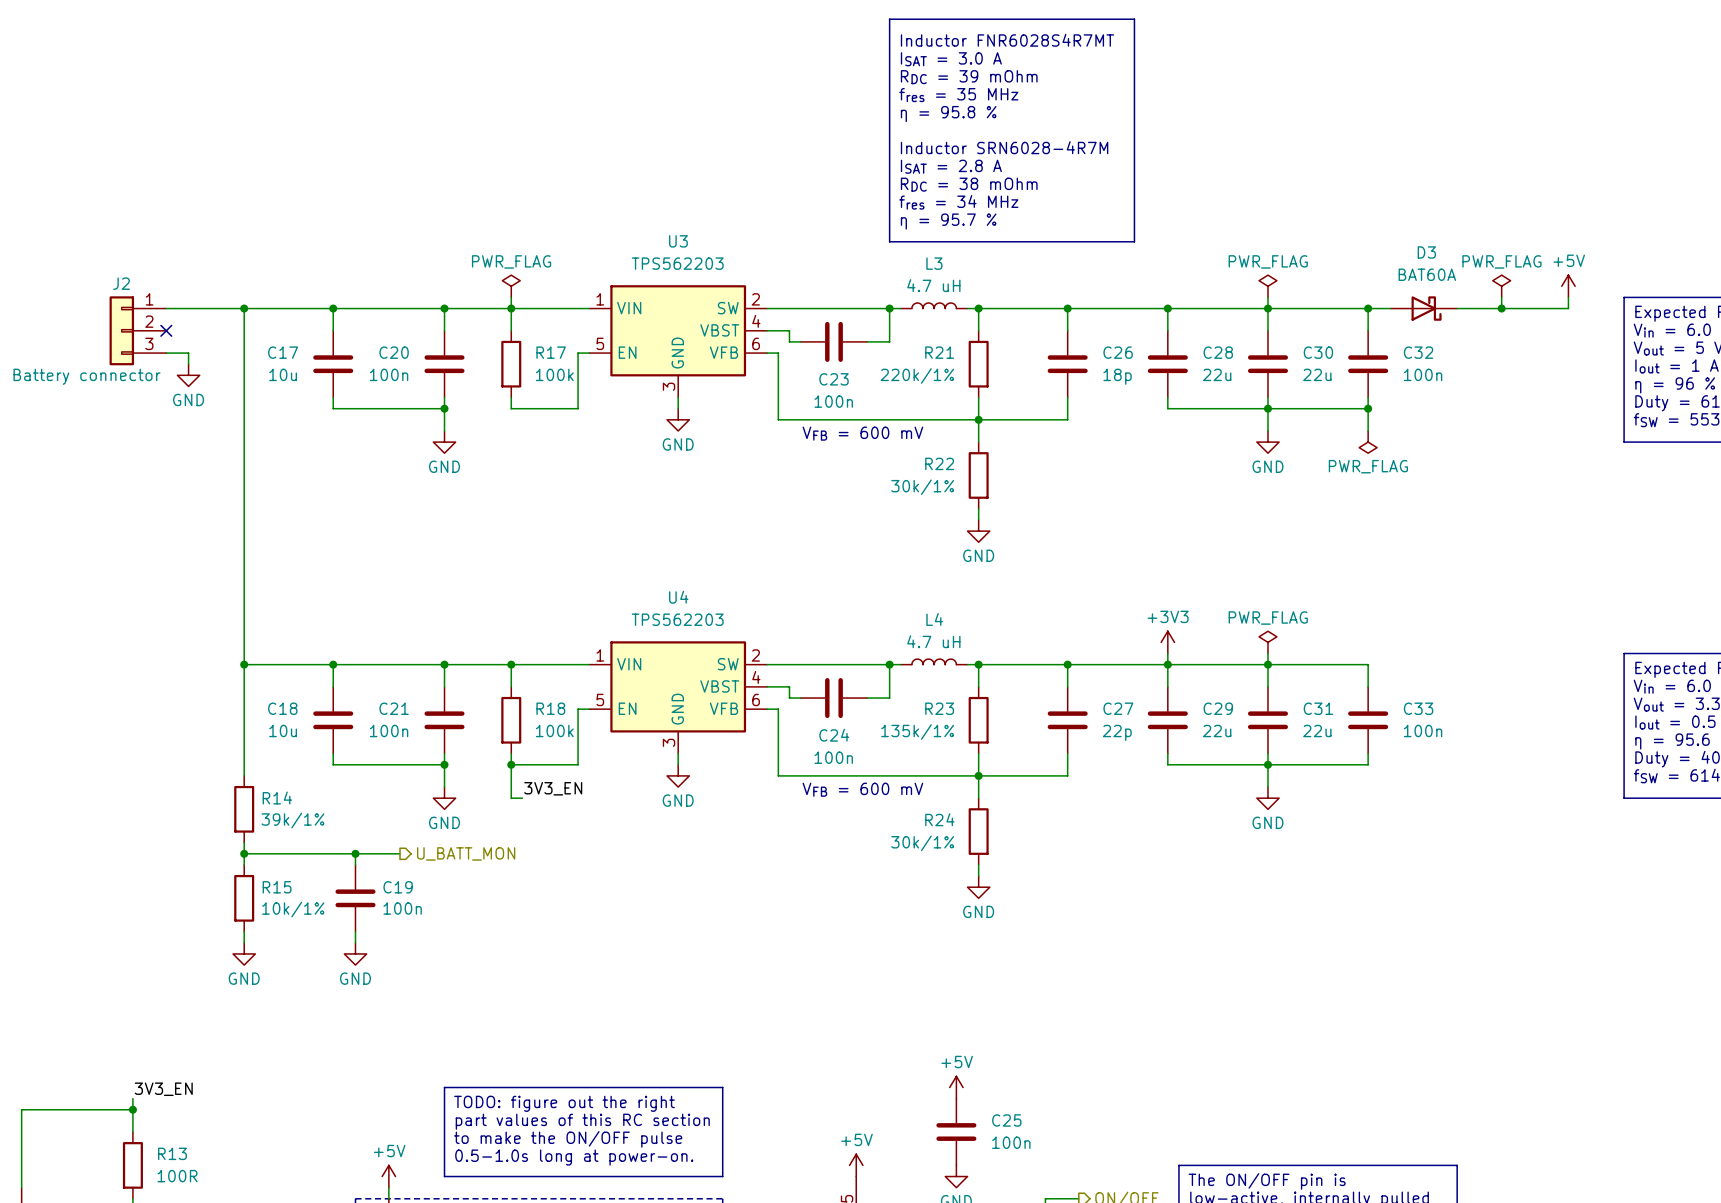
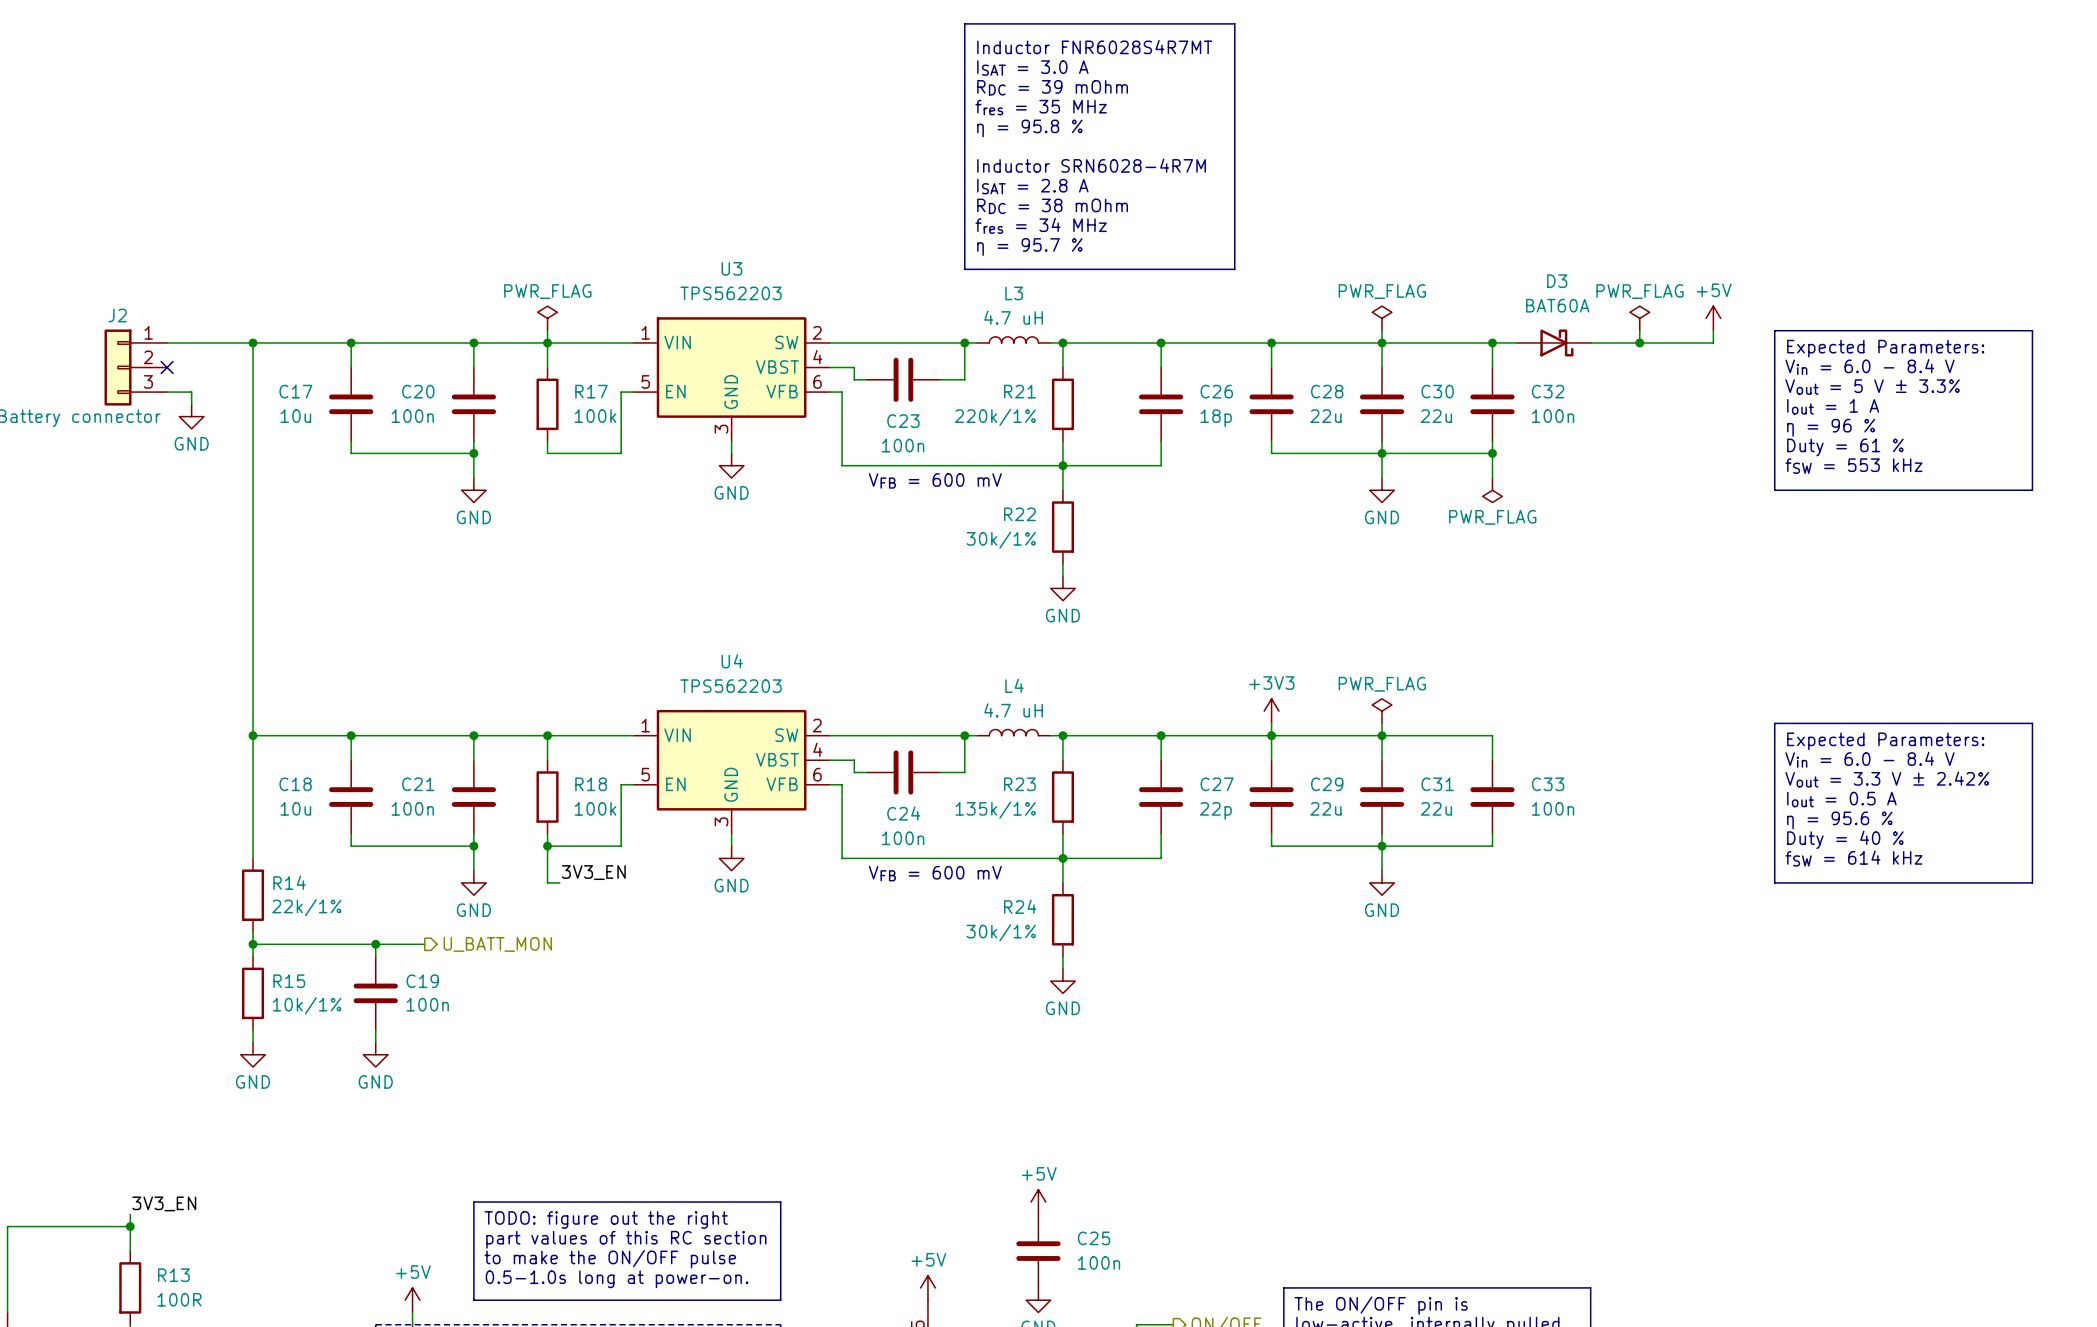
R14 value: 39k/1% (292, 820) -> 22k/1% (306, 907)

